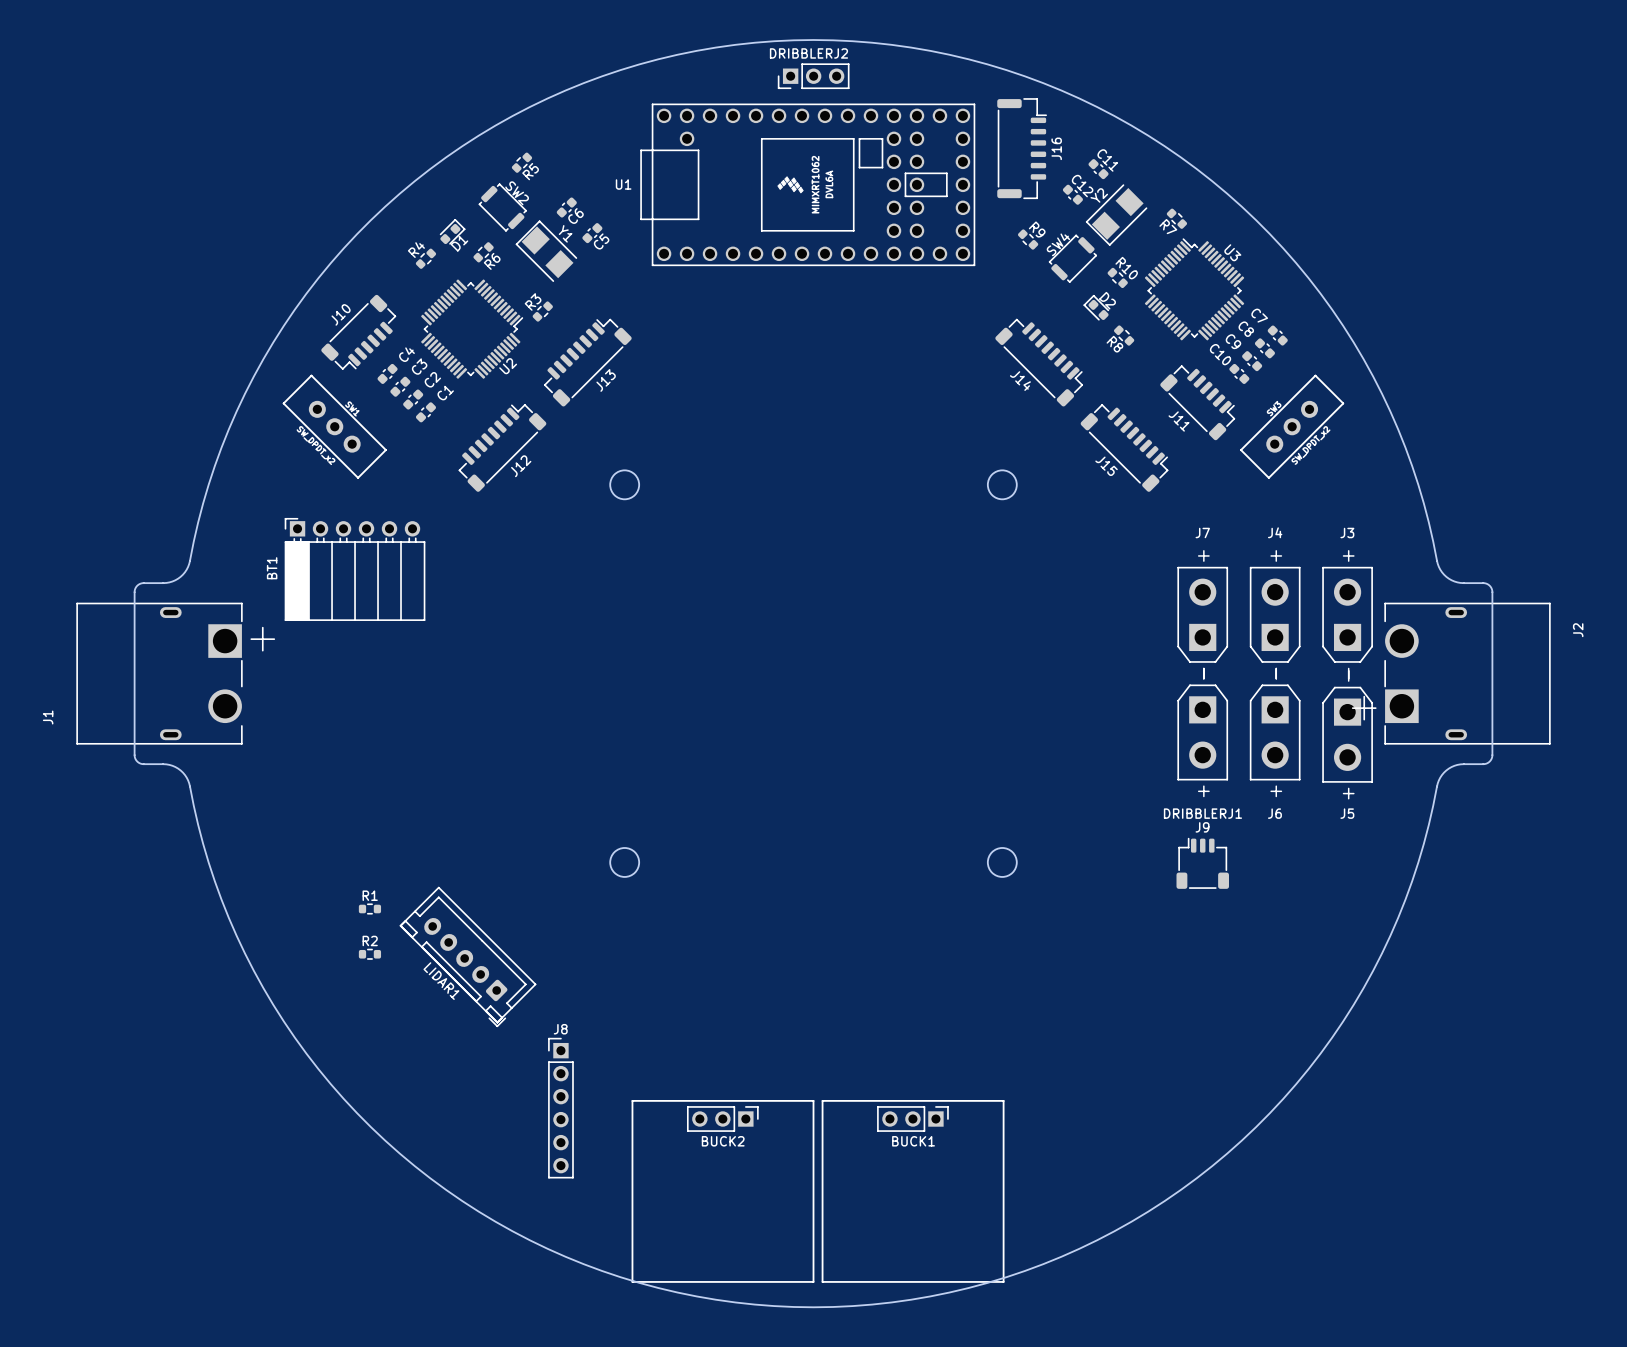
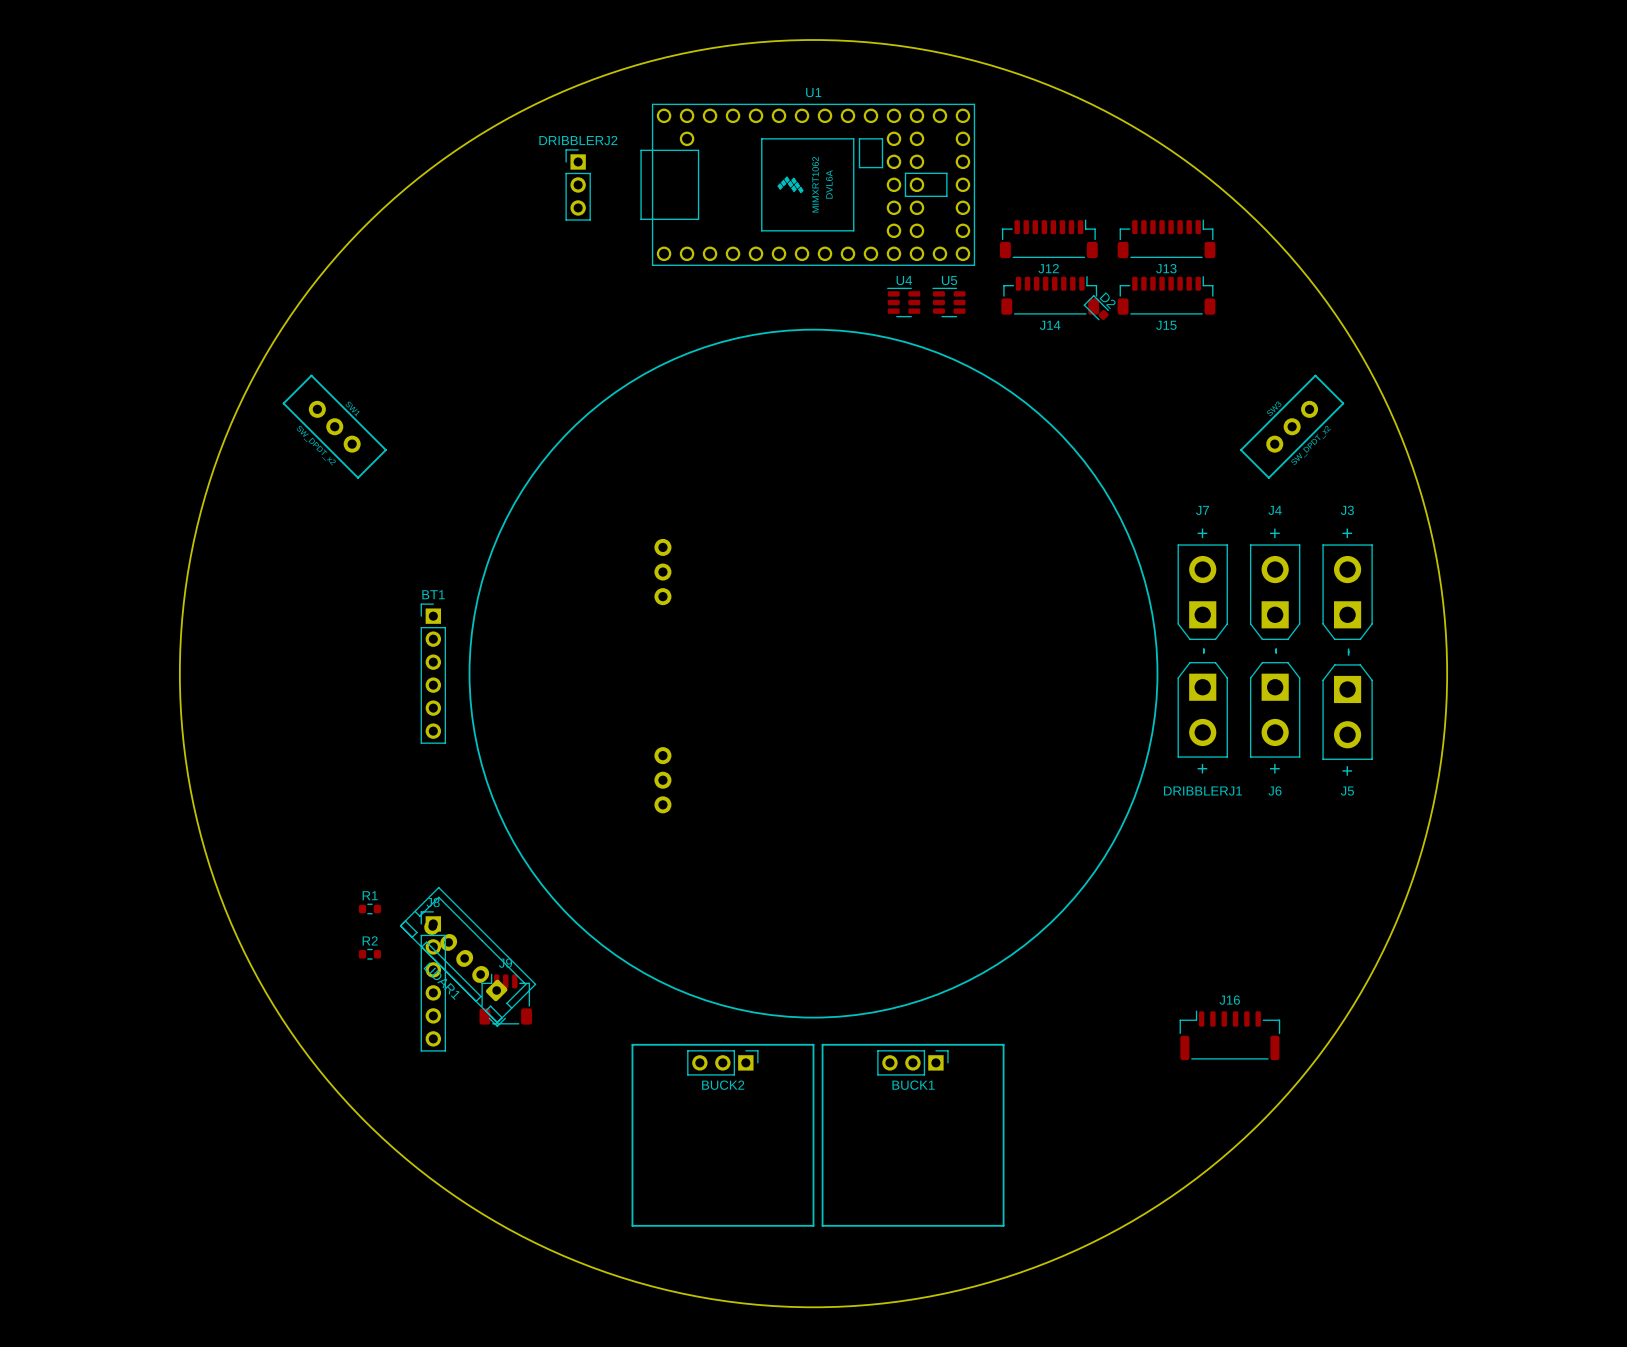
round board edge: none -> [178, 39, 1449, 1309]
DRIBBLERJ2 name position: DRIBBLERJ2 (808, 53) -> DRIBBLERJ2 (578, 140)
DRIBBLERJ2 rotation: 0° (813, 76) -> 90° clockwise (578, 184)
DRIBBLERJ2 position: (813, 76) -> (578, 184)
J16 rotation: 0° (1021, 148) -> 90° counterclockwise (1229, 1035)
J16 position: (1021, 148) -> (1229, 1035)
R5: (521, 162) -> none
C11: (1098, 169) -> none
U1 name position: U1 (623, 184) -> U1 (813, 92)
C12: (1072, 194) -> none
SW2: (502, 207) -> none
C6: (566, 207) -> none
Y2: (1116, 215) -> none
R7: (1176, 218) -> none
D1: (452, 231) -> none
C5: (592, 233) -> none
R9: (1028, 239) -> none
Y1: (546, 251) -> none
R6: (483, 252) -> none
R4: (425, 258) -> none
SW4: (1072, 258) -> none
R10: (1117, 277) -> none
U3: (1194, 289) -> none
U4: none -> (903, 302)
U5: none -> (949, 302)
R3: (542, 311) -> none
drawing: none -> [468, 328, 1159, 1019]
U2: (472, 329) -> none
J10: (358, 332) -> none
R8: (1124, 335) -> none
C7: (1277, 335) -> none
C8: (1264, 348) -> none
C9: (1252, 361) -> none
J13 rotation: 0° (587, 362) -> 45° clockwise (1166, 238)
J13 position: (587, 362) -> (1166, 238)
J14 rotation: 0° (1039, 362) -> 45° counterclockwise (1050, 295)
J14 position: (1039, 362) -> (1050, 295)
C4: (387, 373) -> none
C10: (1239, 373) -> none
C3: (400, 386) -> none
C2: (413, 399) -> none
J11: (1197, 402) -> none
C1: (425, 412) -> none
J12 rotation: 0° (502, 448) -> 45° clockwise (1048, 238)
J12 position: (502, 448) -> (1048, 238)
J15 rotation: 0° (1124, 448) -> 45° counterclockwise (1166, 295)
J15 position: (1124, 448) -> (1166, 295)
round board edge: [609, 469, 641, 501] -> none
round board edge: [986, 469, 1018, 501] -> none
BT1 footprint: [284, 518, 426, 621] -> [420, 603, 446, 744]
board edge: (189, 560) (185, 572) (175, 580) (166, 582) (141, 583) (134, 590) (134, 757) (141, 763) (172, 765) (180, 770) (186, 777) (208, 862) (228, 917) (253, 970) (294, 1037) (330, 1084) (370, 1127) (414, 1166) (478, 1211) (547, 1248) (602, 1270) (658, 1287) (715, 1299) (774, 1306) (833, 1306) (891, 1302) (968, 1287) (1024, 1270) (1079, 1248) (1131, 1221) (1180, 1189) (1227, 1153) (1256, 1127) (1296, 1084) (1332, 1037) (1363, 988) (1398, 917) (1418, 862) (1440, 777) (1446, 770) (1454, 765) (1485, 763) (1489, 761) (1492, 756) (1491, 589) (1485, 583) (1454, 581) (1446, 576) (1440, 569) (1418, 484) (1390, 411) (1353, 342) (1308, 278) (1269, 234) (1227, 193) (1180, 157) (1131, 125) (1079, 98) (1024, 76) (968, 59) (911, 47) (852, 41) (774, 41) (715, 47) (658, 59) (602, 76) (547, 98) (495, 125) (446, 157) (399, 193) (357, 234) (318, 278) (283, 325) (244, 393) (221, 447) (203, 503) (189, 560) -> none
BT1 name position: BT1 (272, 568) -> BT1 (433, 594)
part: none -> (662, 572)
J7 position: (1202, 614) -> (1202, 592)
J4 position: (1275, 614) -> (1275, 592)
J3 position: (1347, 614) -> (1347, 592)
J1: (175, 673) -> none
J2: (1451, 673) -> none
DRIBBLERJ1 position: (1202, 732) -> (1202, 709)
J6 position: (1275, 732) -> (1275, 709)
J5 position: (1347, 734) -> (1347, 712)
part: none -> (662, 780)
round board edge: [609, 847, 641, 878] -> none
round board edge: [986, 847, 1018, 878] -> none
J9 position: (1202, 863) -> (505, 999)
line: (632, 1100) (813, 1100) -> (632, 1100) (632, 1044) (813, 1044) (813, 1100)
line: (822, 1100) (1003, 1100) -> (822, 1100) (822, 1044) (1003, 1044) (1003, 1100)
J8 position: (560, 1108) -> (433, 981)
BUCK2 position: (722, 1119) -> (722, 1062)
BUCK1 position: (912, 1119) -> (912, 1062)
line: (632, 1225) (632, 1281) (813, 1281) (813, 1225) -> (632, 1225) (813, 1225)
line: (822, 1225) (822, 1281) (1003, 1281) (1003, 1225) -> (822, 1225) (1003, 1225)

